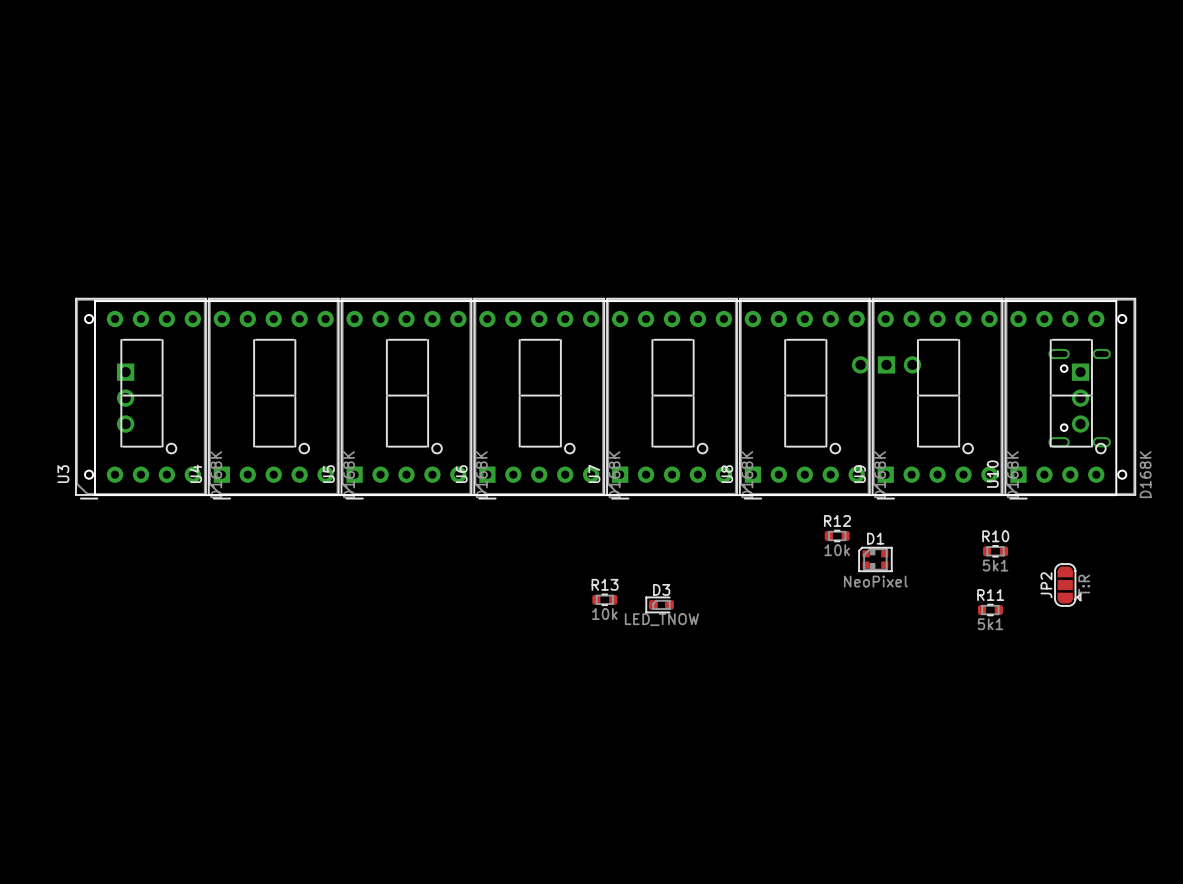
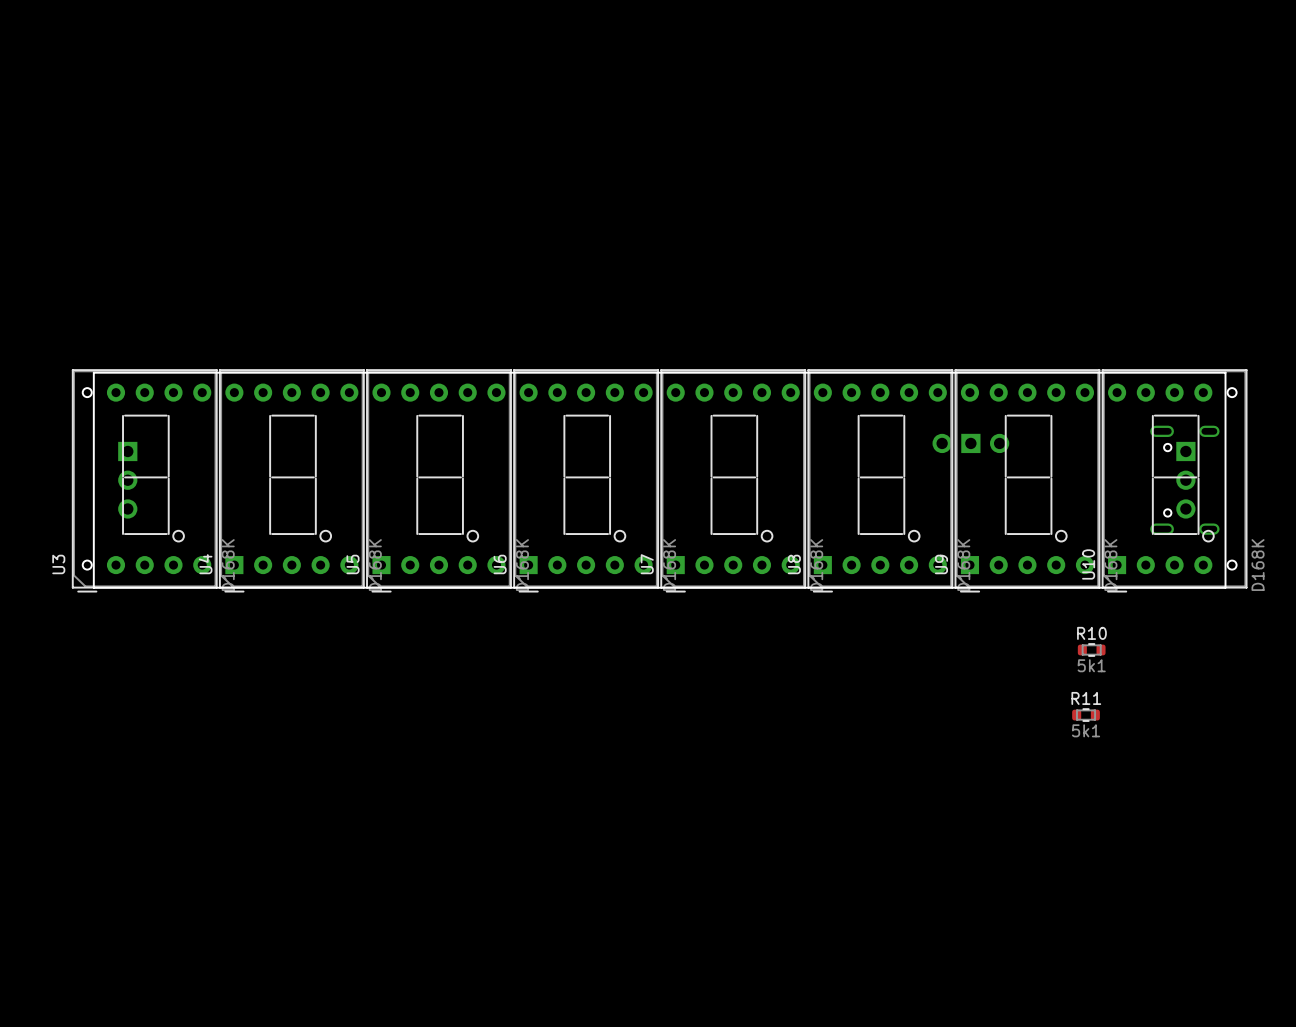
R12: 10k (837, 535) -> none
D1: NeoPixel (875, 559) -> none
JP2: T:R (1067, 585) -> none
R13: 10k (604, 599) -> none
D3: LED_TNOW (659, 604) -> none

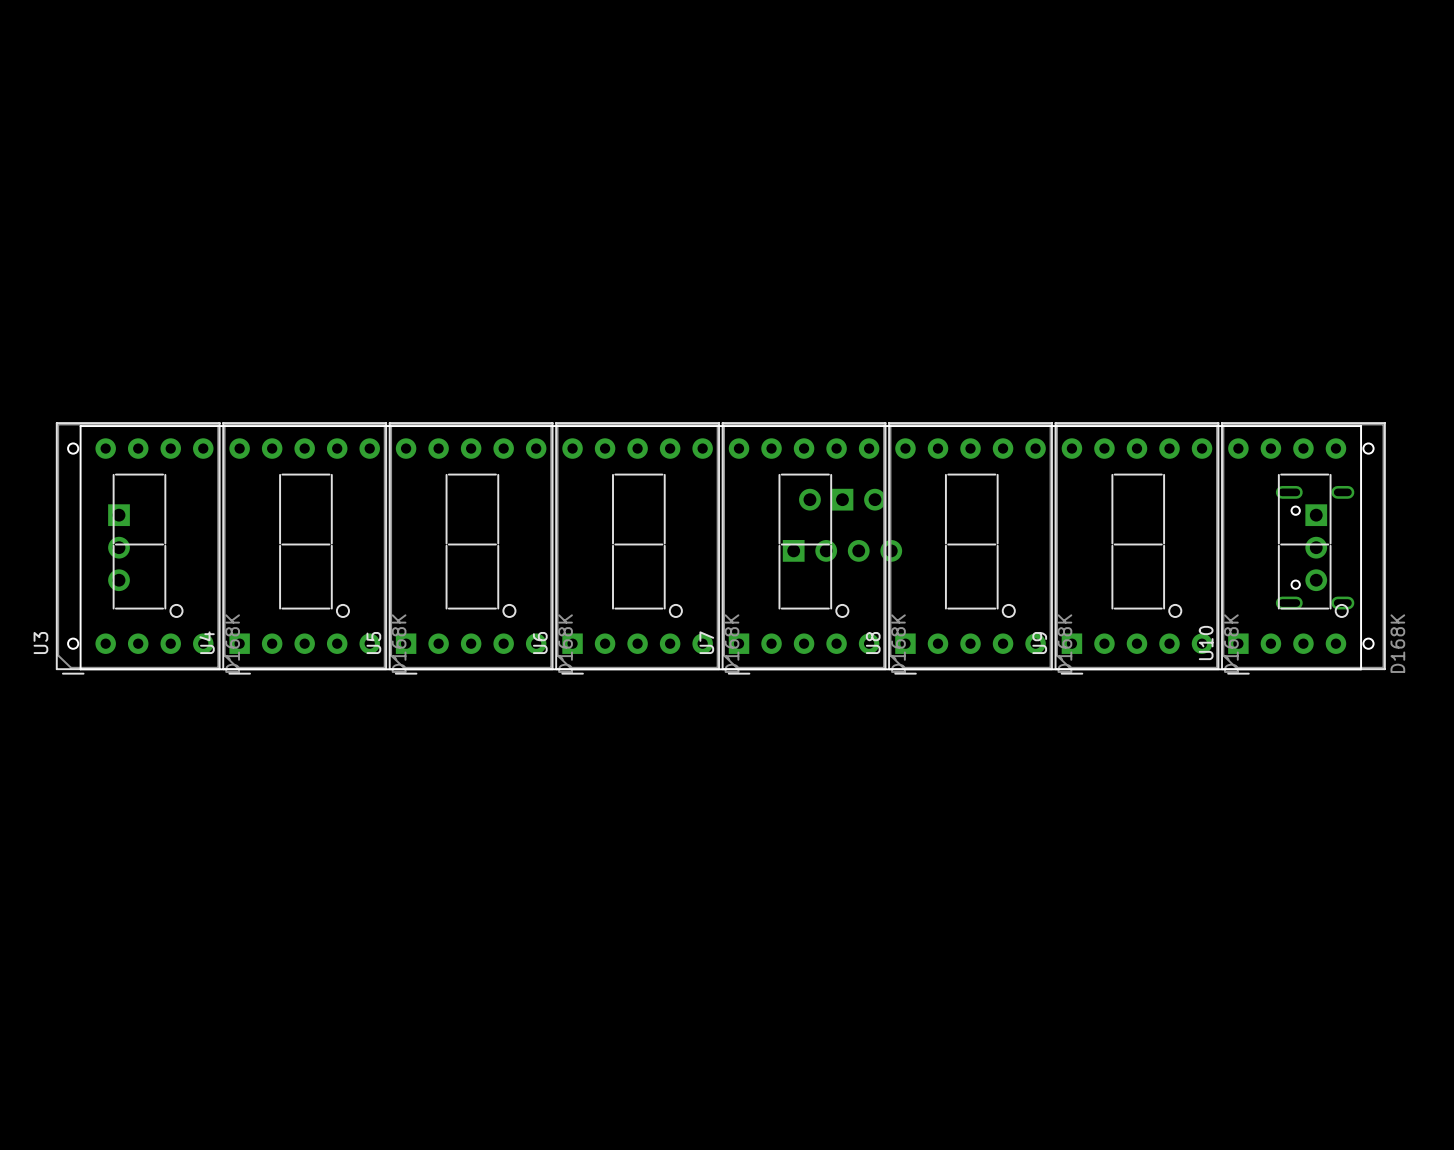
part position: (970, 443) -> (842, 499)
part: none -> (842, 550)
R10: 5k1 (1091, 649) -> none
R11: 5k1 (1086, 715) -> none

